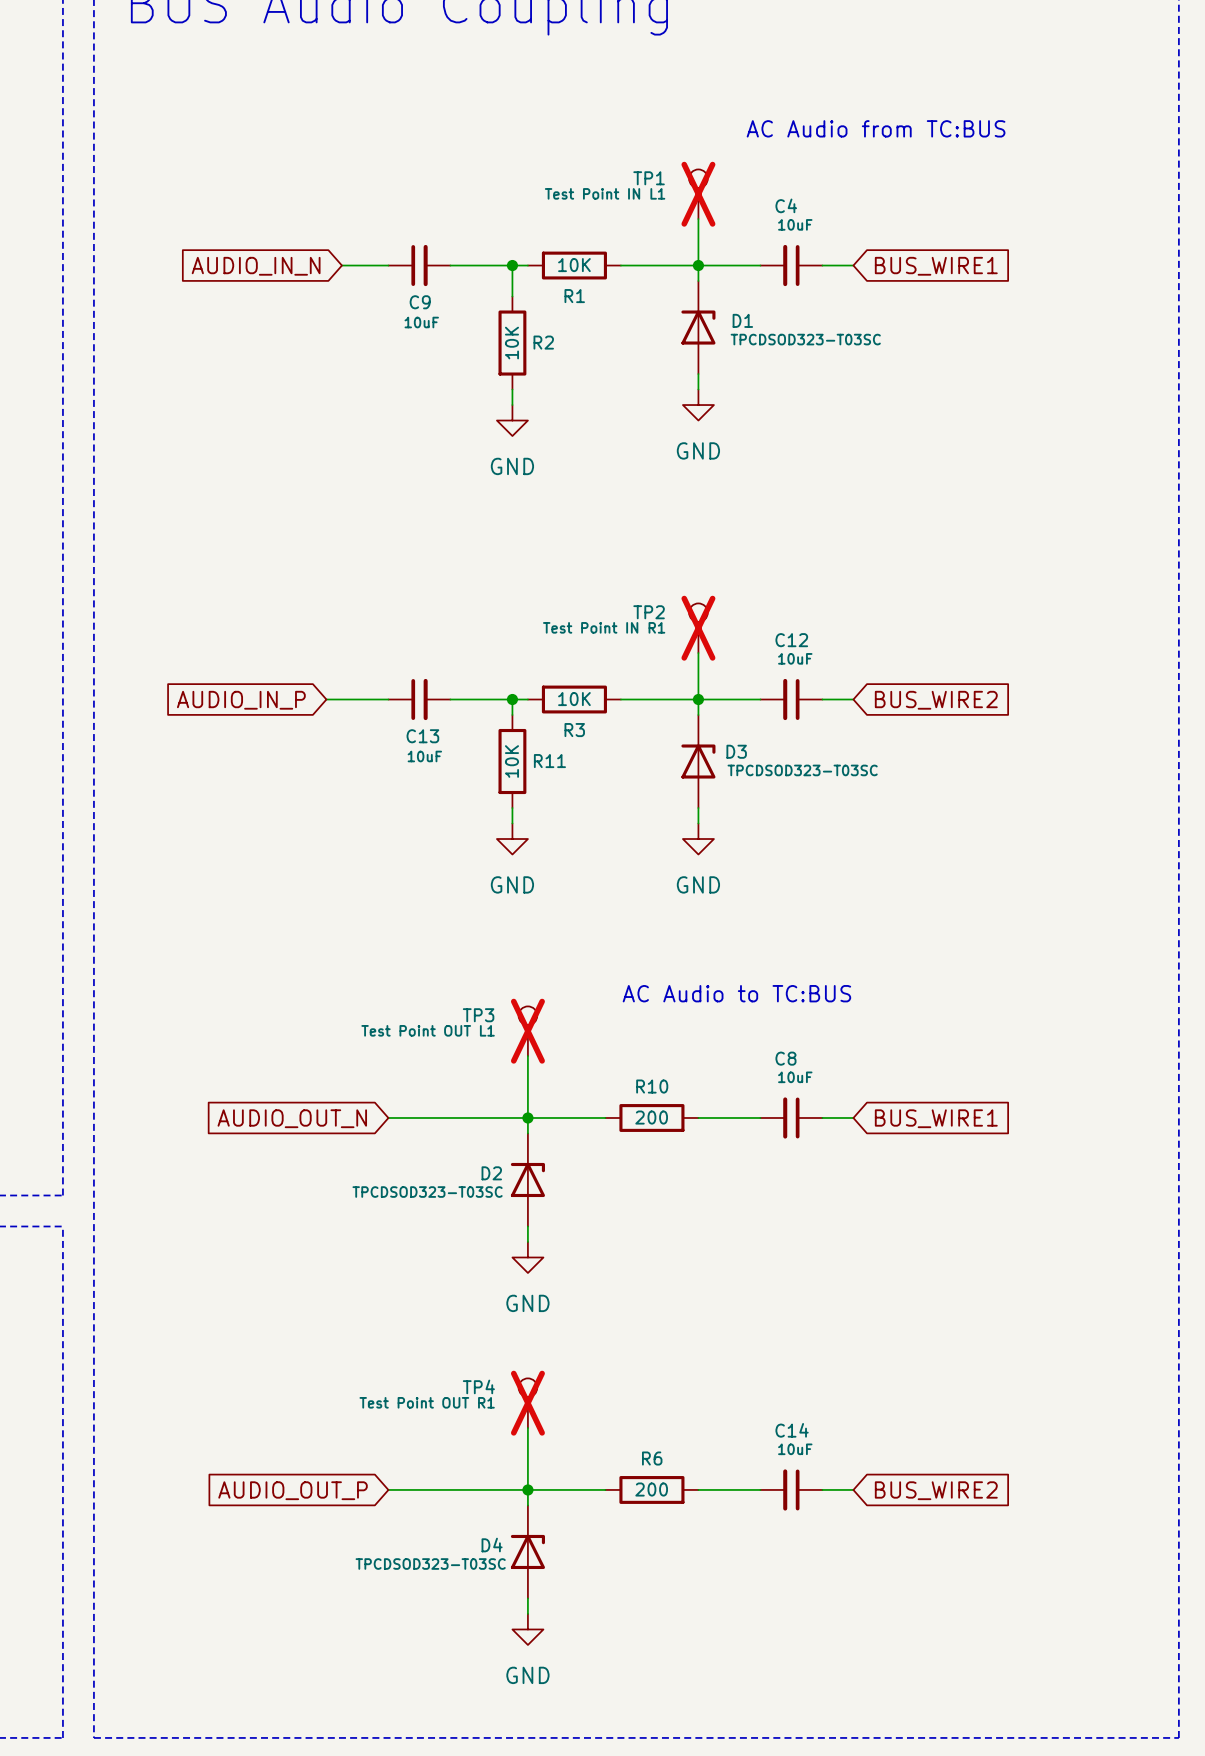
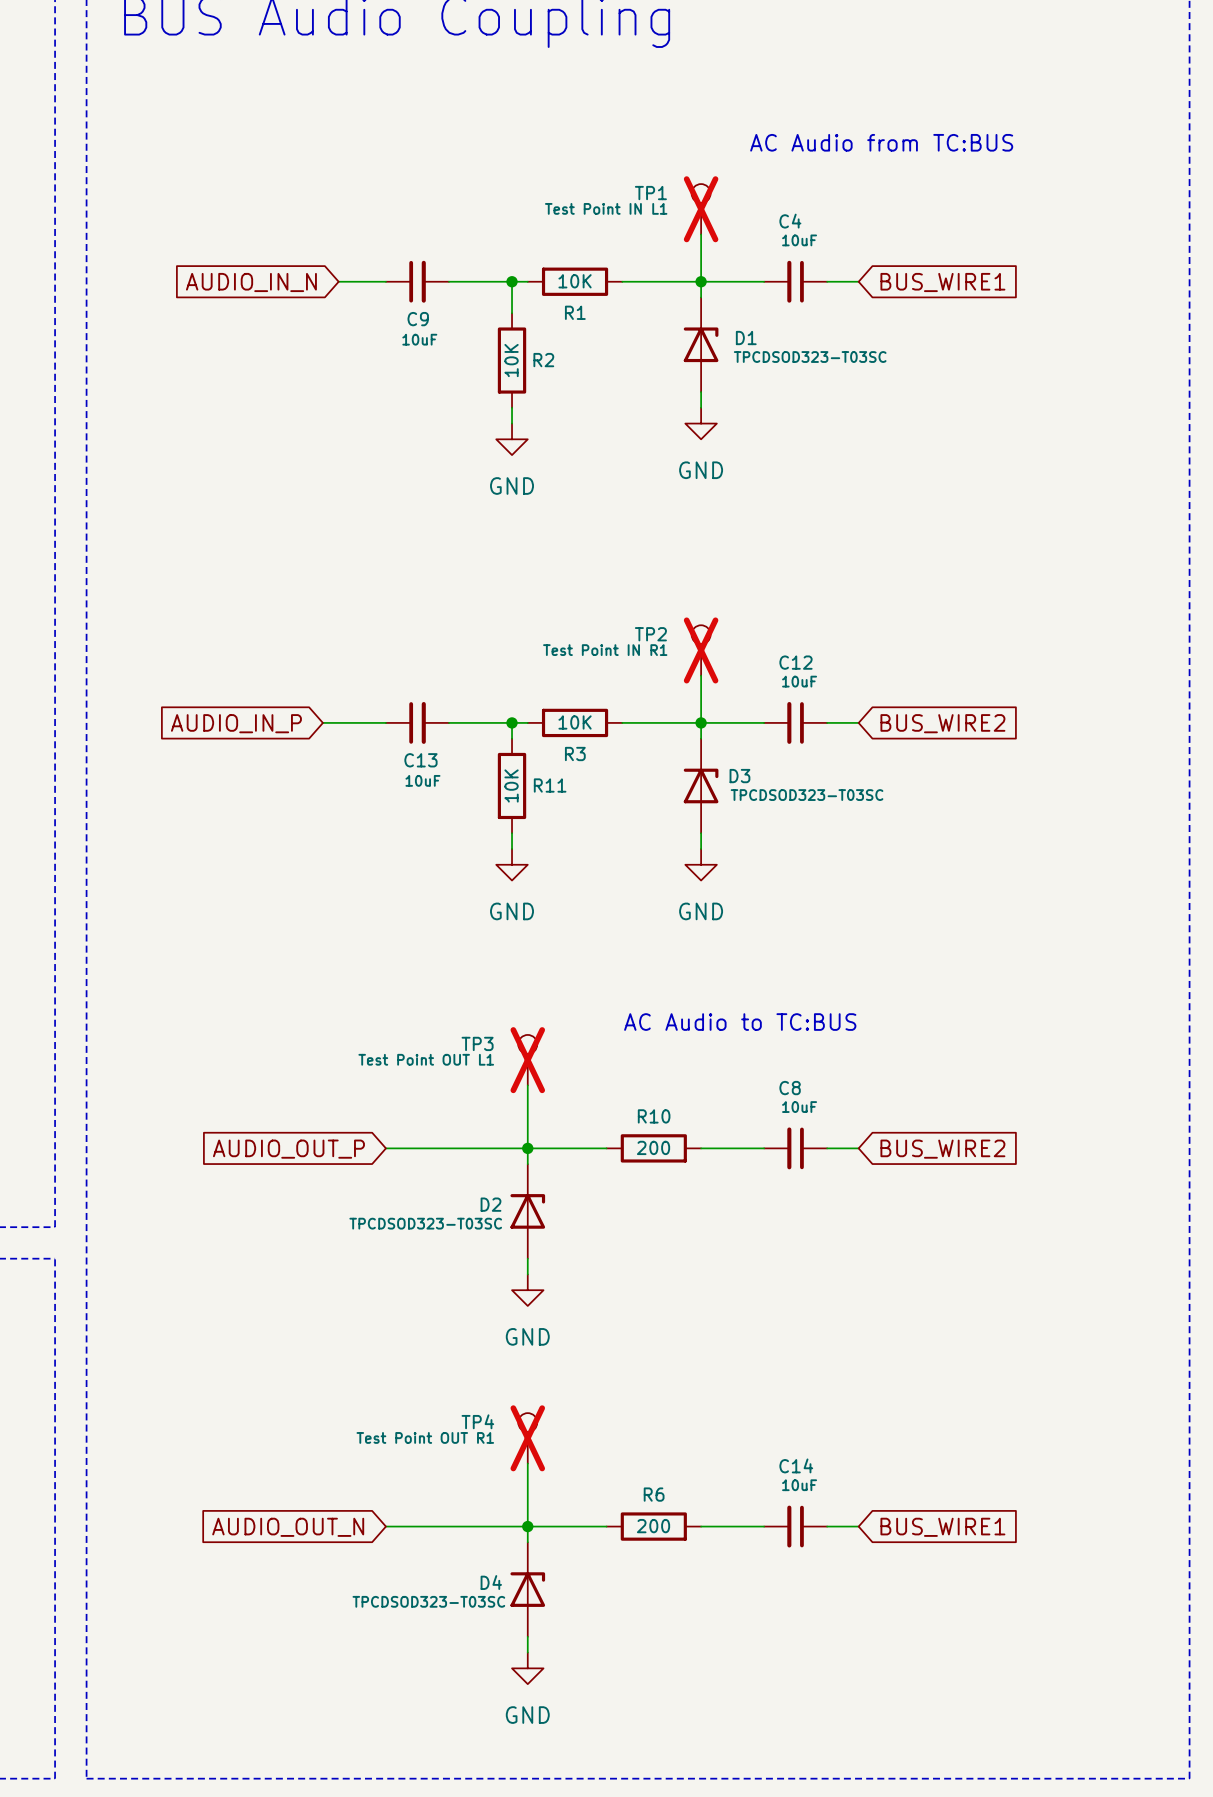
global label: AUDIO_OUT_N (292, 1118) -> AUDIO_OUT_P (288, 1149)
global label: BUS_WIRE1 (936, 1118) -> BUS_WIRE2 (942, 1149)
global label: AUDIO_OUT_P (293, 1490) -> AUDIO_OUT_N (288, 1527)
global label: BUS_WIRE2 (936, 1490) -> BUS_WIRE1 (942, 1527)

